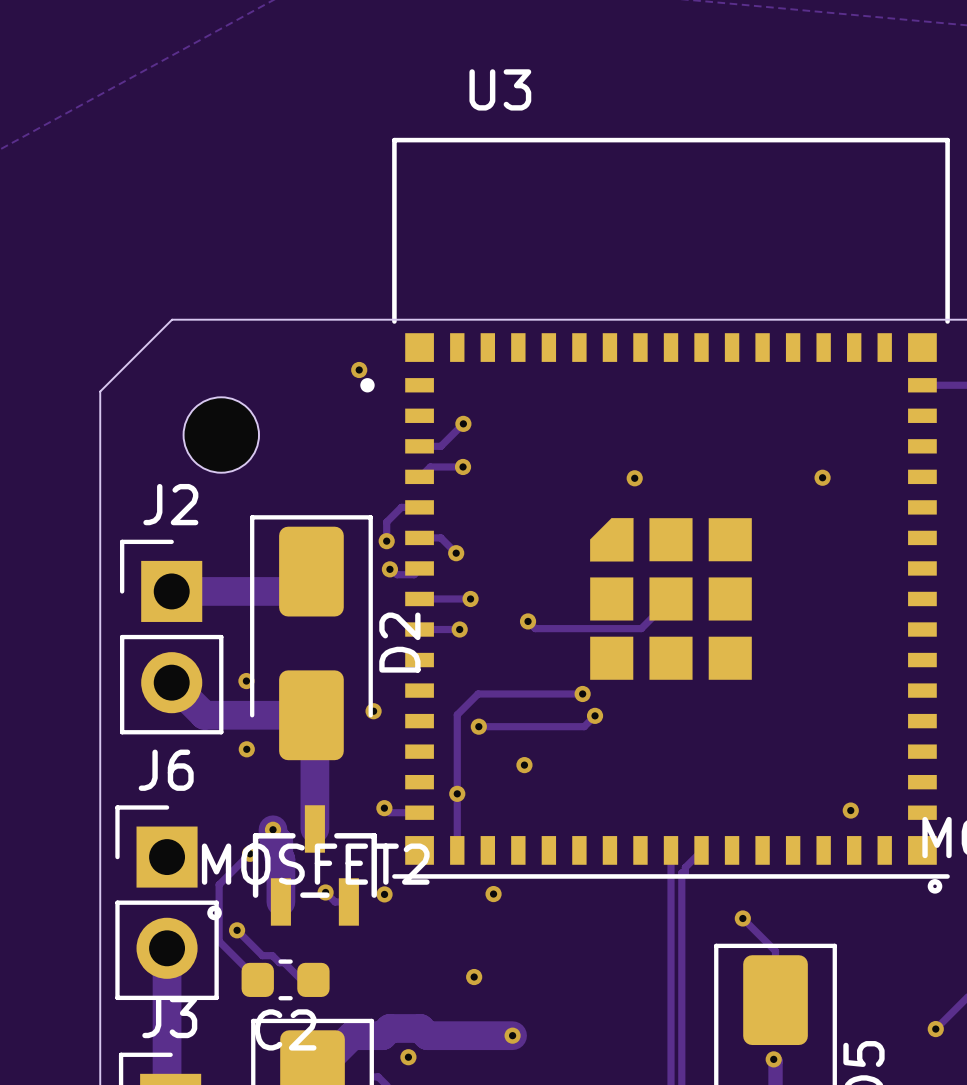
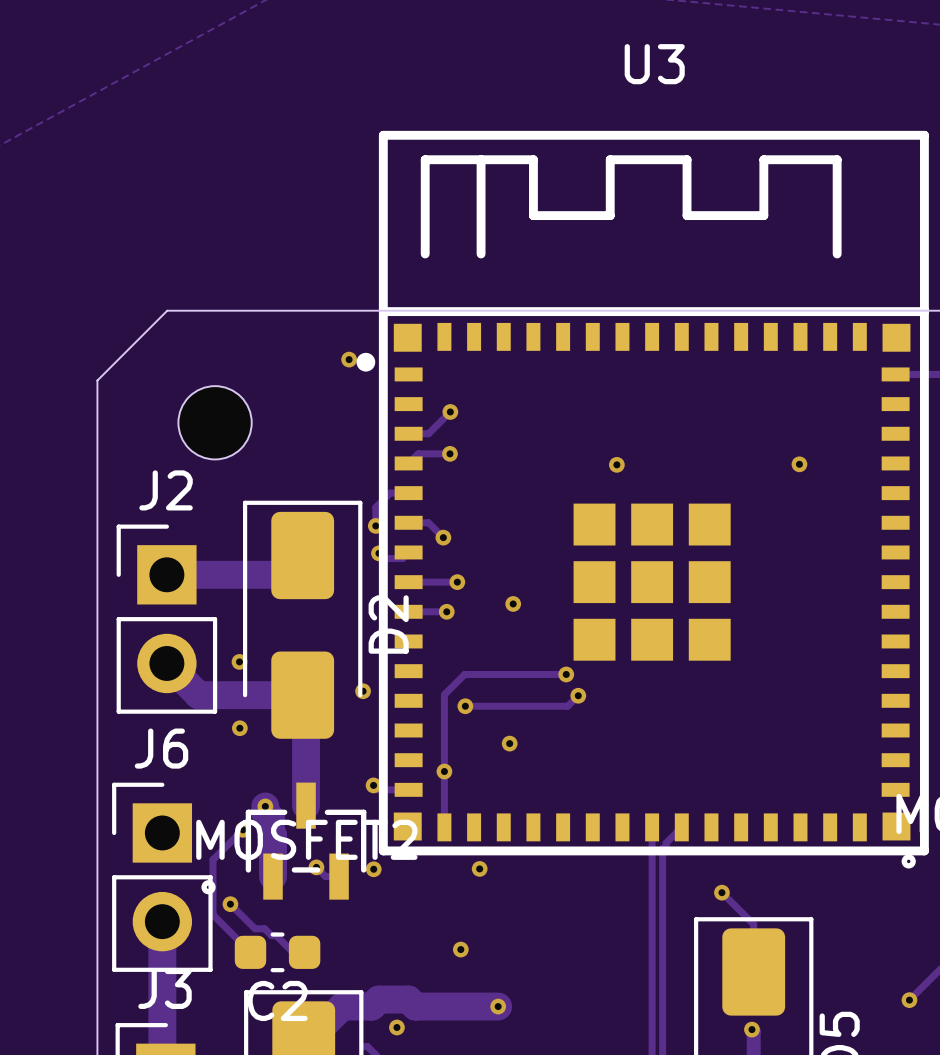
U3 name position: U3 (500, 89) -> U3 (654, 64)
U3 footprint: [360, 137, 950, 879] -> [356, 130, 929, 856]
track: (671, 598) (641, 628) (535, 628) (528, 621) -> none
via: (850, 810) -> none

